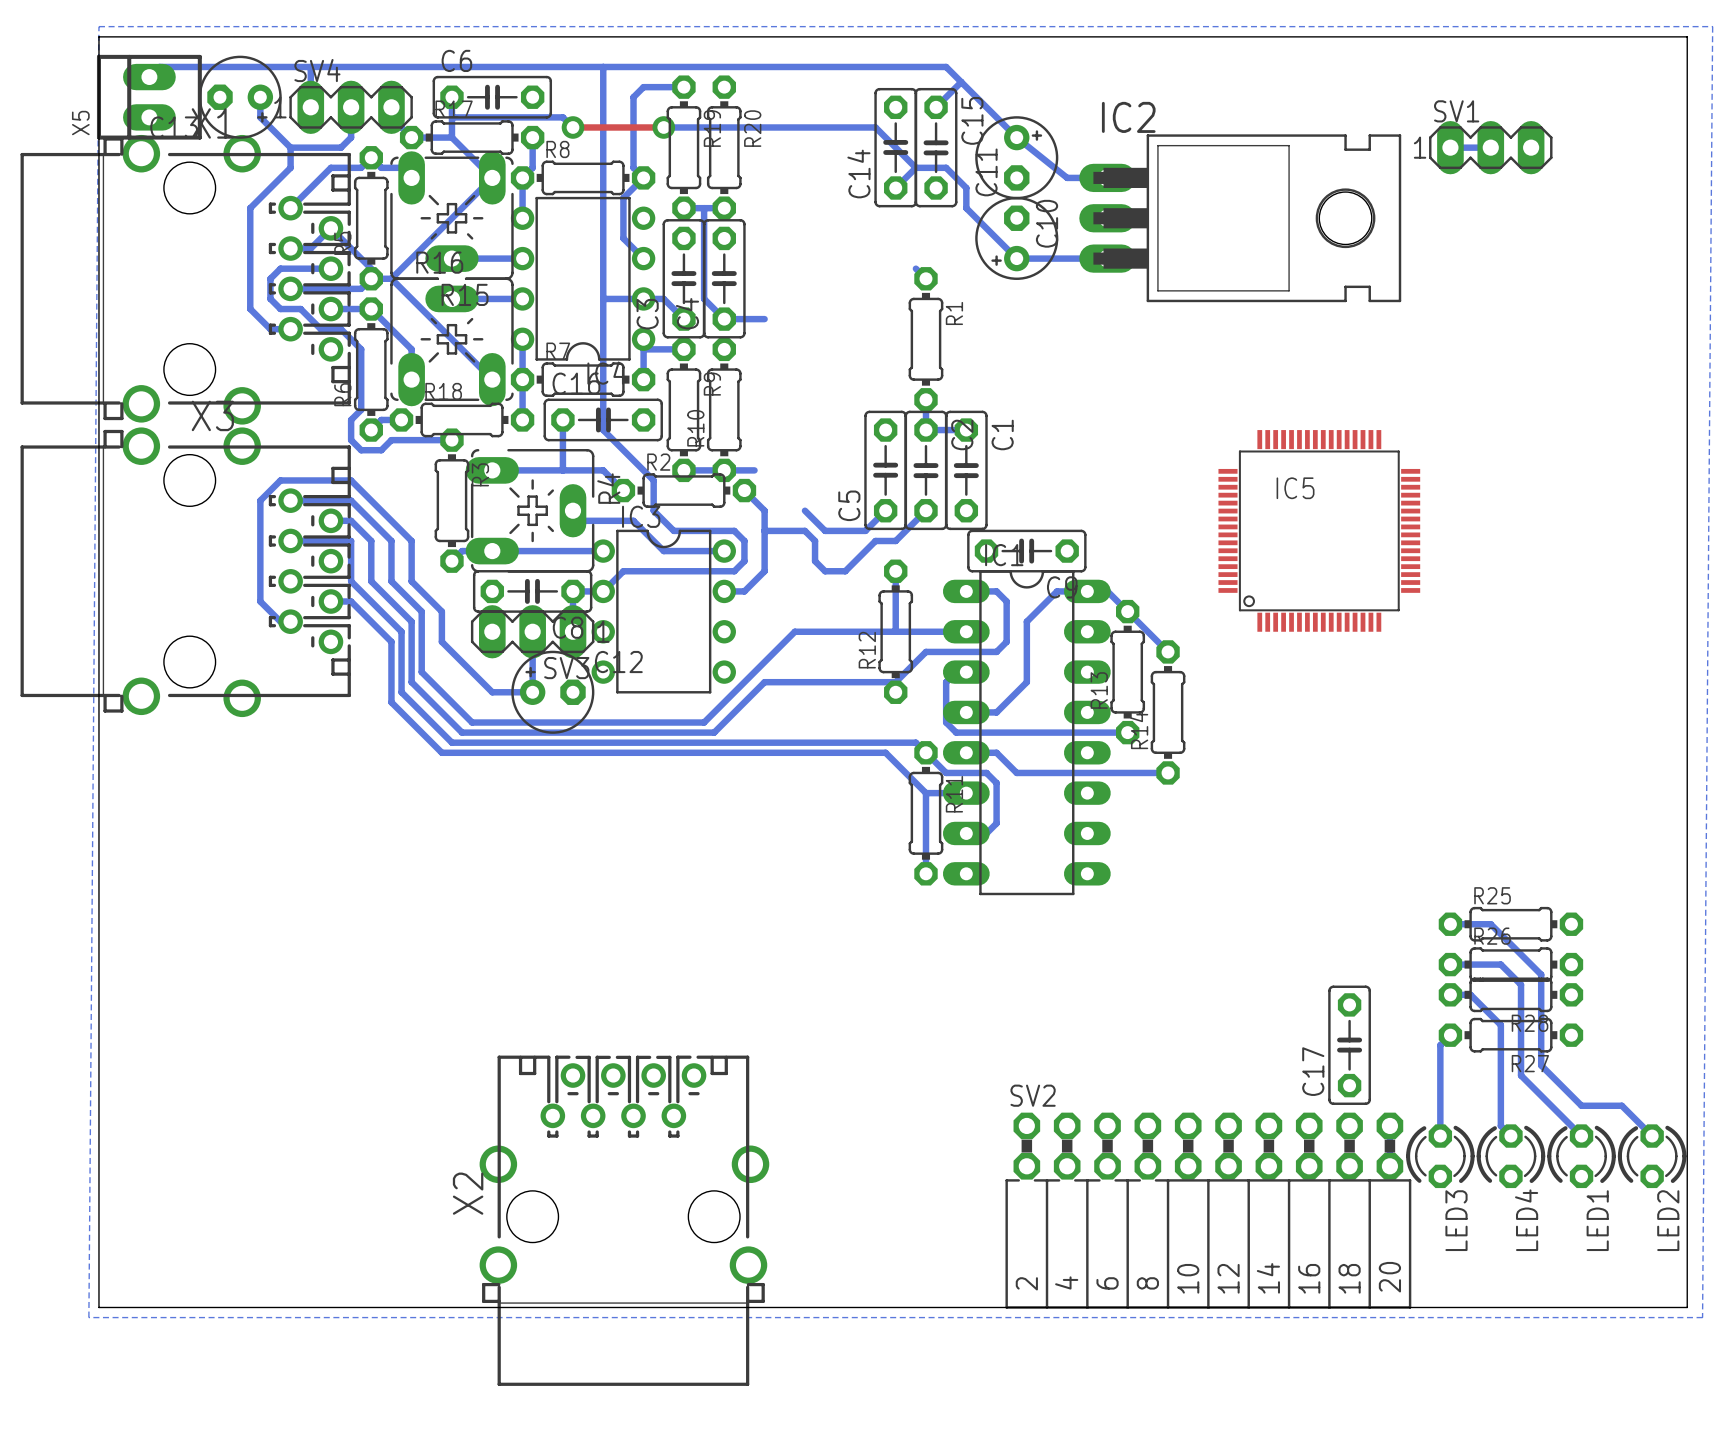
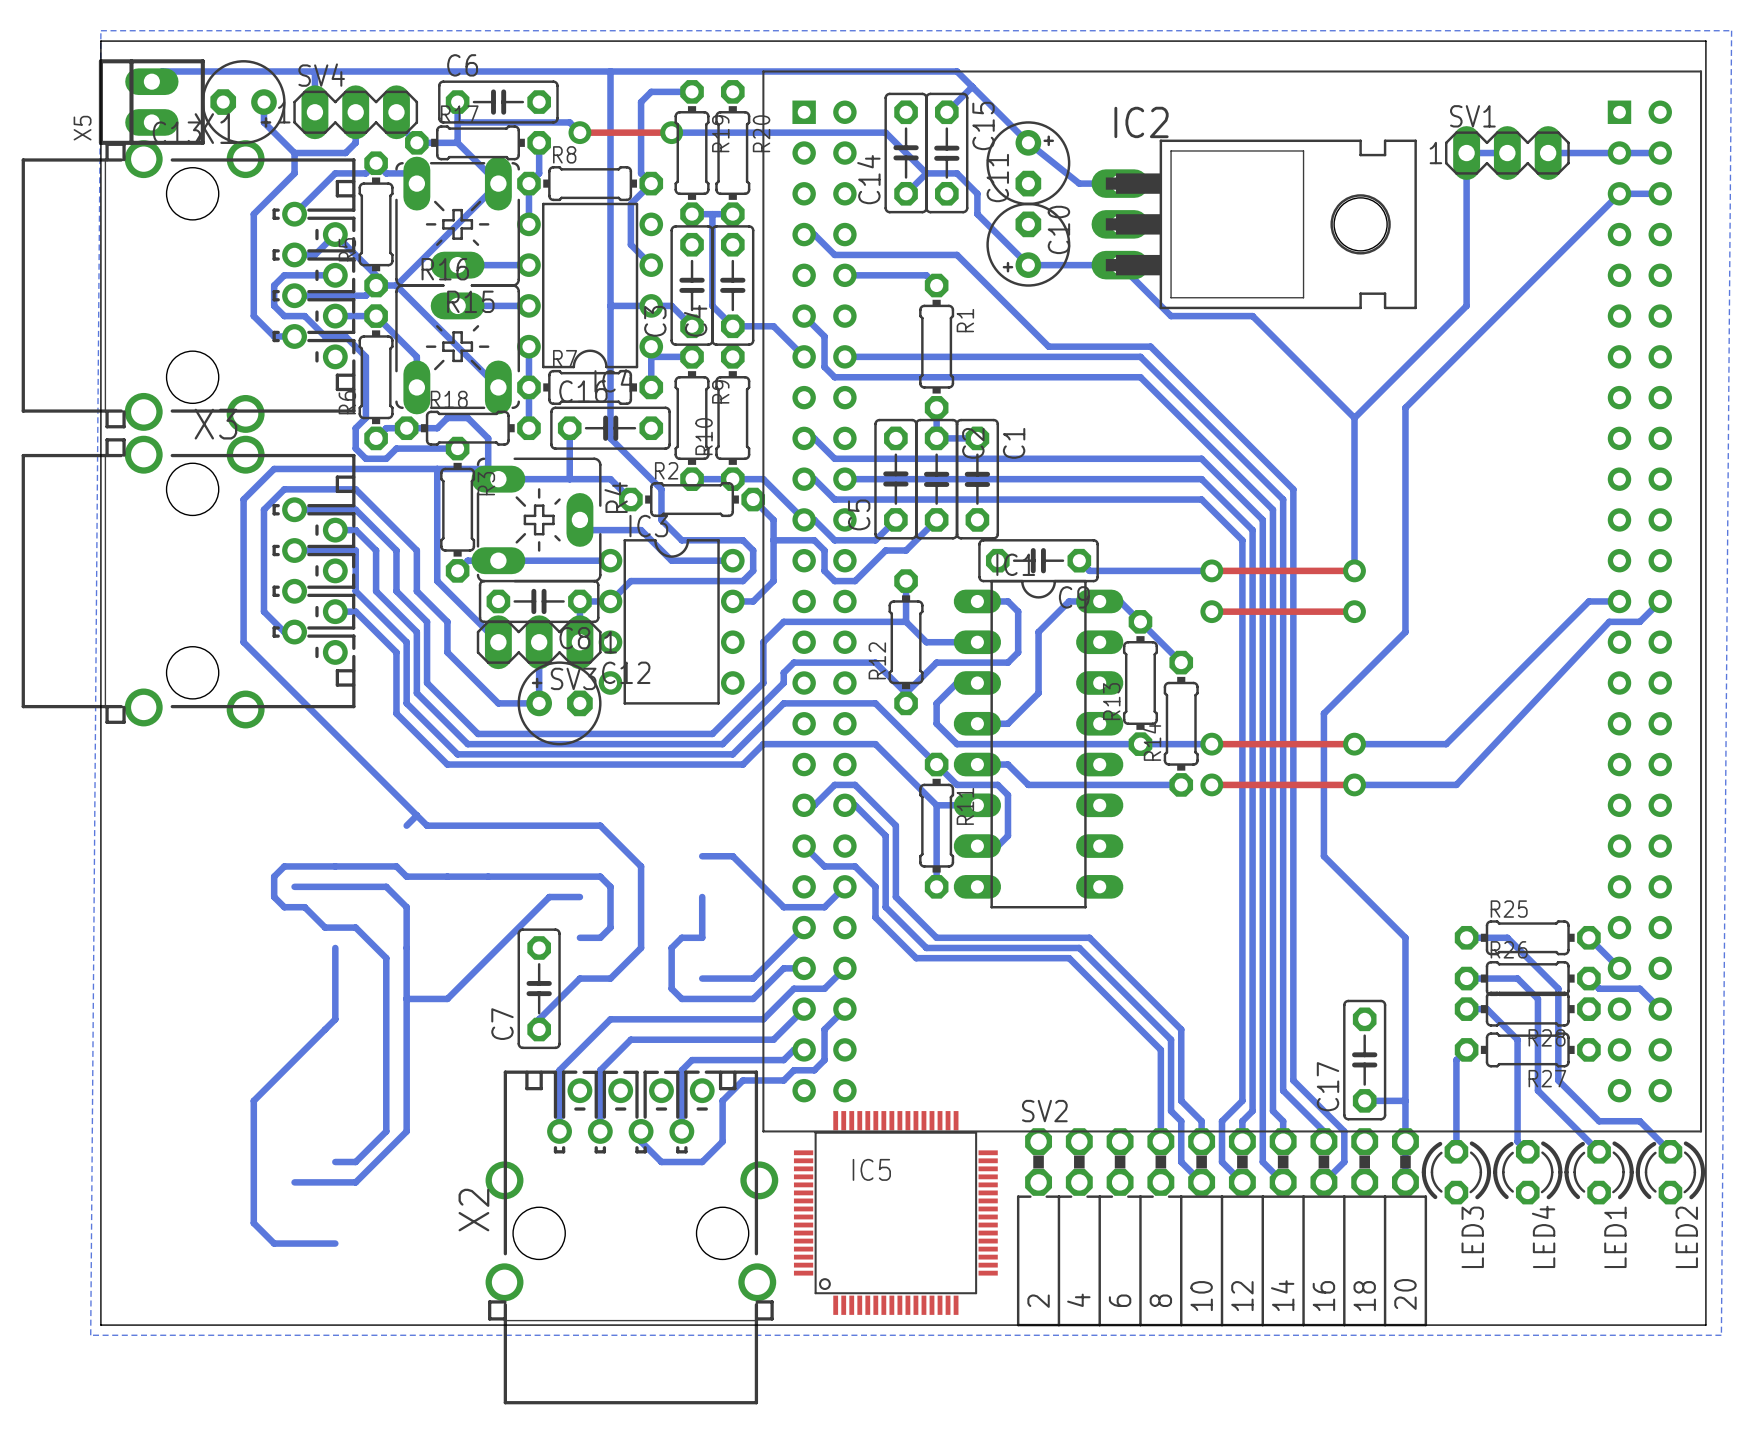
bottom track: none -> (1466, 153) (1466, 305) (1354, 418)
bottom track: none -> (1548, 153) (1660, 153)
bottom track: none -> (1660, 193) (1619, 193) (1405, 407) (1405, 632) (1323, 713) (1323, 856) (1405, 937) (1405, 1141)
bottom track: none -> (804, 234) (814, 234) (834, 254) (957, 254) (1048, 346) (1150, 346) (1293, 489) (1293, 1080) (1344, 1131) (1344, 1162) (1323, 1182)
bottom track: none -> (1120, 265) (1171, 316) (1252, 316) (1354, 418)
bottom track: none -> (844, 275) (926, 275)
bottom track: none -> (804, 316) (824, 336) (824, 367) (834, 377) (1140, 377) (1272, 509) (1272, 1111) (1283, 1121) (1283, 1141)
bottom track: none -> (773, 326) (804, 356)
bottom track: none -> (844, 356) (1140, 356) (1283, 499) (1283, 1090) (1323, 1131) (1323, 1141)
bottom track: none -> (1354, 418) (1354, 570)
bottom track: none -> (406, 428) (437, 428) (447, 418) (467, 418) (488, 438) (488, 468)
bottom track: none -> (804, 438) (814, 438) (834, 458) (1201, 458) (1262, 519) (1262, 1162) (1283, 1182)
bottom track: none -> (437, 468) (437, 581) (498, 642)
bottom track: none -> (488, 468) (274, 468) (243, 499) (243, 642) (427, 825) (600, 825) (641, 866) (641, 947) (610, 978) (579, 978) (539, 1019) (539, 1029)
bottom track: none -> (763, 479) (804, 519) (814, 519)
bottom track: none -> (804, 479) (814, 479) (834, 499) (1201, 499) (1242, 540) (1242, 1100) (1222, 1121) (1222, 1162) (1242, 1182)
bottom track: none -> (844, 479) (1201, 479) (1252, 530) (1252, 1111) (1242, 1121) (1242, 1141)
IC5 position: (1319, 530) -> (895, 1212)
bottom track: none -> (1079, 560) (1089, 570) (1211, 570)
top track: none -> (1211, 570) (1354, 570)
via: none -> (1211, 570)
via: none -> (1354, 570)
part: none -> (1232, 601)
bottom track: none -> (1619, 601) (1588, 601) (1446, 744) (1354, 744)
bottom track: none -> (1660, 601) (1639, 621) (1609, 621) (1456, 784) (1354, 784)
top track: none -> (1211, 611) (1354, 611)
via: none -> (1211, 611)
via: none -> (1354, 611)
bottom track: (895, 611) (895, 631) -> none
bottom track: (915, 631) (794, 631) (754, 672) -> (926, 642) (906, 621) (783, 621) (763, 642) (763, 683)
bottom track: (956, 672) (946, 682) (946, 722) (956, 732) -> (967, 683) (957, 683) (936, 703) (936, 723) (957, 744) (967, 744)
bottom track: (764, 682) (895, 682) -> (773, 693) (783, 683) (783, 672) (793, 662) (875, 662) (906, 693)
bottom track: none -> (1140, 744) (1211, 744)
top track: none -> (1211, 744) (1354, 744)
via: none -> (1211, 744)
via: none -> (1354, 744)
bottom track: (724, 742) (915, 742) -> (732, 754) (783, 703) (875, 703) (926, 754)
bottom track: (734, 752) (885, 752) -> (742, 764) (763, 744) (875, 744) (895, 764)
top track: none -> (1211, 784) (1354, 784)
via: none -> (1211, 784)
via: none -> (1354, 784)
bottom track: none -> (804, 805) (814, 805) (834, 784) (855, 784) (895, 825) (895, 897) (936, 937) (1089, 937) (1181, 1029) (1181, 1100) (1201, 1121) (1201, 1141)
bottom track: none -> (844, 805) (855, 805) (885, 835) (885, 907) (926, 947) (1079, 947) (1171, 1039) (1171, 1111) (1181, 1121) (1181, 1162) (1201, 1182)
bottom track: none -> (416, 815) (406, 825)
bottom track: none -> (804, 846) (824, 866) (855, 866) (875, 886) (875, 917) (916, 958) (1069, 958) (1160, 1049) (1160, 1141)
bottom track: none -> (702, 856) (732, 856) (783, 907) (824, 907) (844, 886)
bottom track: none -> (294, 886) (386, 886) (406, 907) (406, 1131) (355, 1182) (294, 1182)
bottom track: none -> (579, 897) (549, 897) (447, 998) (406, 998)
bottom track: none -> (702, 897) (702, 937) (681, 937) (671, 947) (671, 988) (681, 998) (753, 998) (783, 968) (804, 968)
bottom track: none -> (804, 927) (753, 978) (702, 978)
bottom track: none -> (579, 937) (600, 937) (610, 927) (610, 886) (600, 876) (406, 876) (396, 866) (284, 866) (274, 876) (274, 897) (284, 907) (304, 907) (325, 927) (355, 927) (386, 958) (386, 1131) (355, 1162) (335, 1162)
bottom track: none -> (1588, 937) (1619, 968)
bottom track: none -> (335, 947) (335, 1019) (253, 1100) (253, 1223) (274, 1243) (335, 1243)
bottom track: none -> (844, 968) (824, 988) (793, 988) (763, 1019) (610, 1019) (559, 1070) (559, 1131)
bottom track: none -> (1588, 978) (1599, 988) (1639, 988) (1660, 1009)
C7: none -> (539, 988)
bottom track: none -> (804, 1009) (773, 1039) (630, 1039) (600, 1070) (600, 1131)
bottom track: none -> (844, 1009) (824, 1029) (824, 1060) (814, 1070) (793, 1070) (783, 1080) (742, 1080) (722, 1100) (722, 1141) (702, 1162) (661, 1162) (641, 1141) (641, 1131)
bottom track: none -> (804, 1049) (793, 1049) (783, 1060) (692, 1060) (681, 1070) (681, 1131)
bottom track: none -> (1364, 1100) (1405, 1100)

